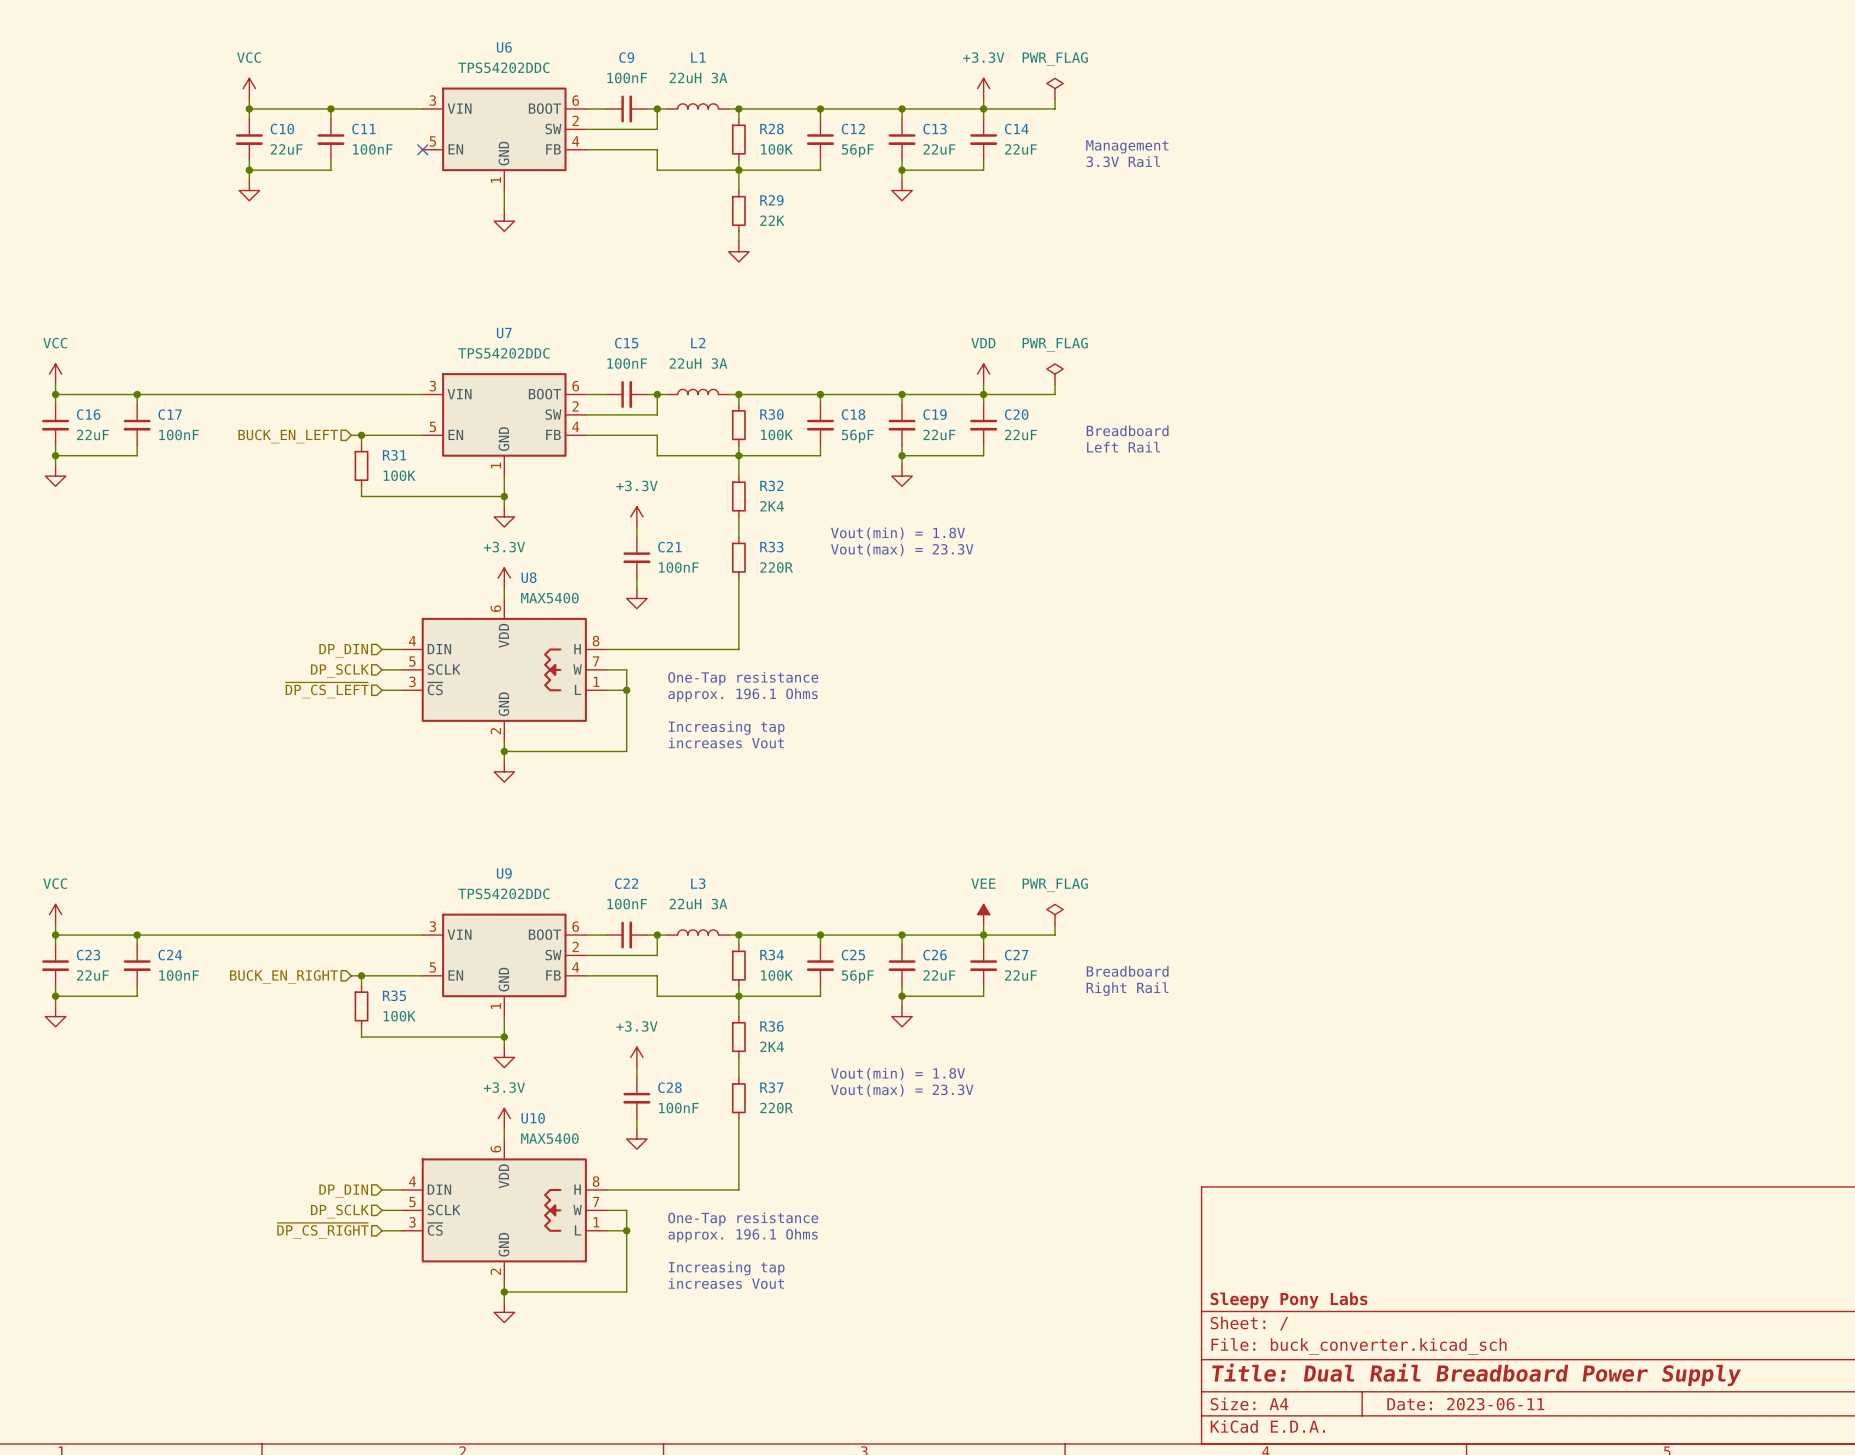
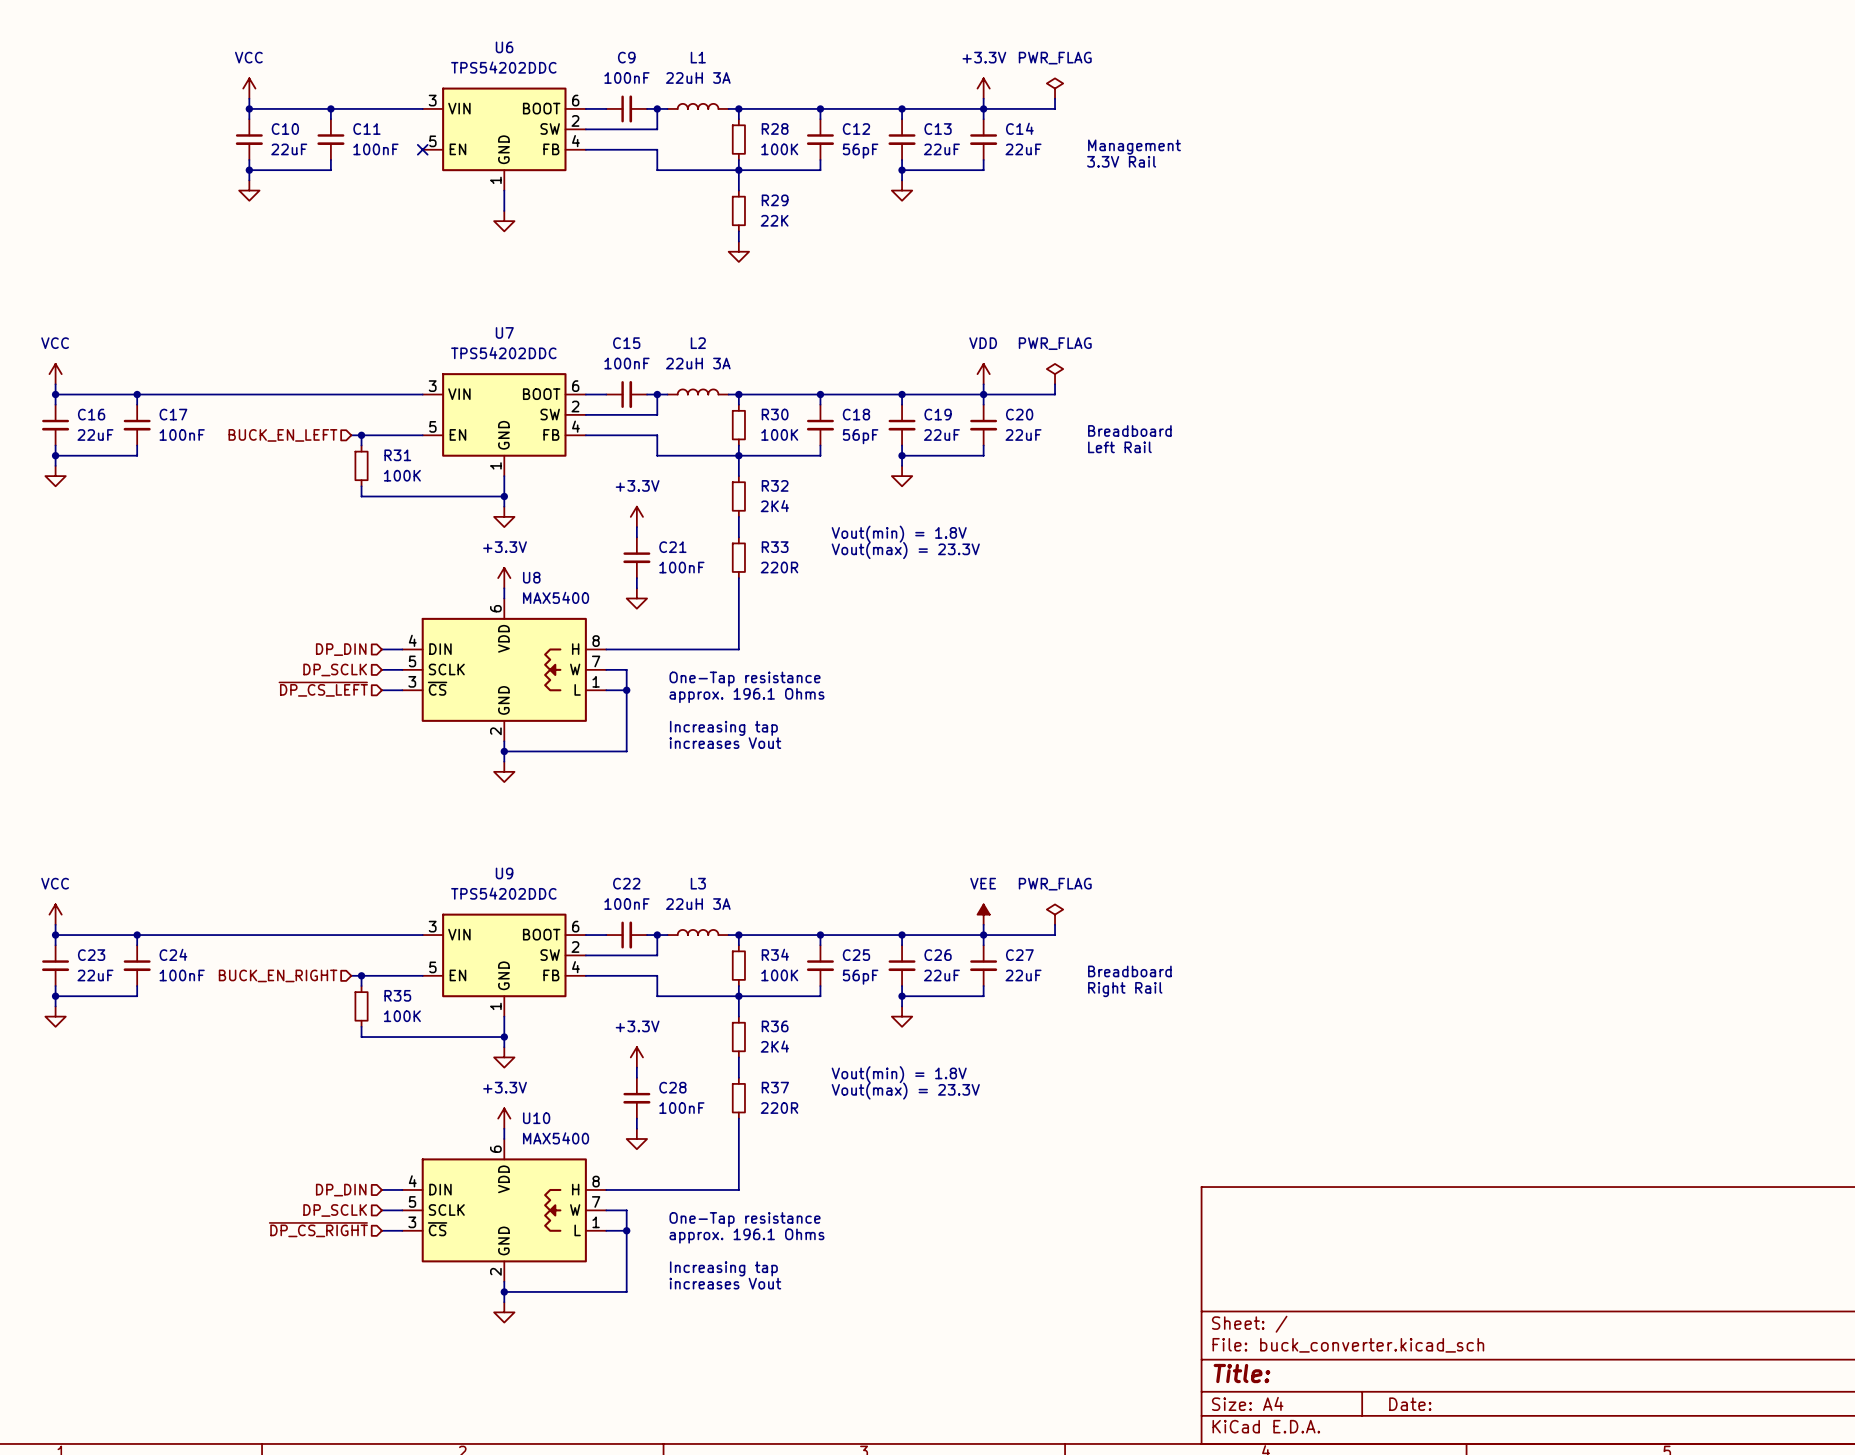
title block: Sleepy Pony Labs (1289, 1300) -> none
title block: Title: Dual Rail Breadboard Power Supply (1476, 1374) -> Title: (1241, 1373)
title block: Date: 2023-06-11 (1465, 1404) -> Date: (1410, 1404)

